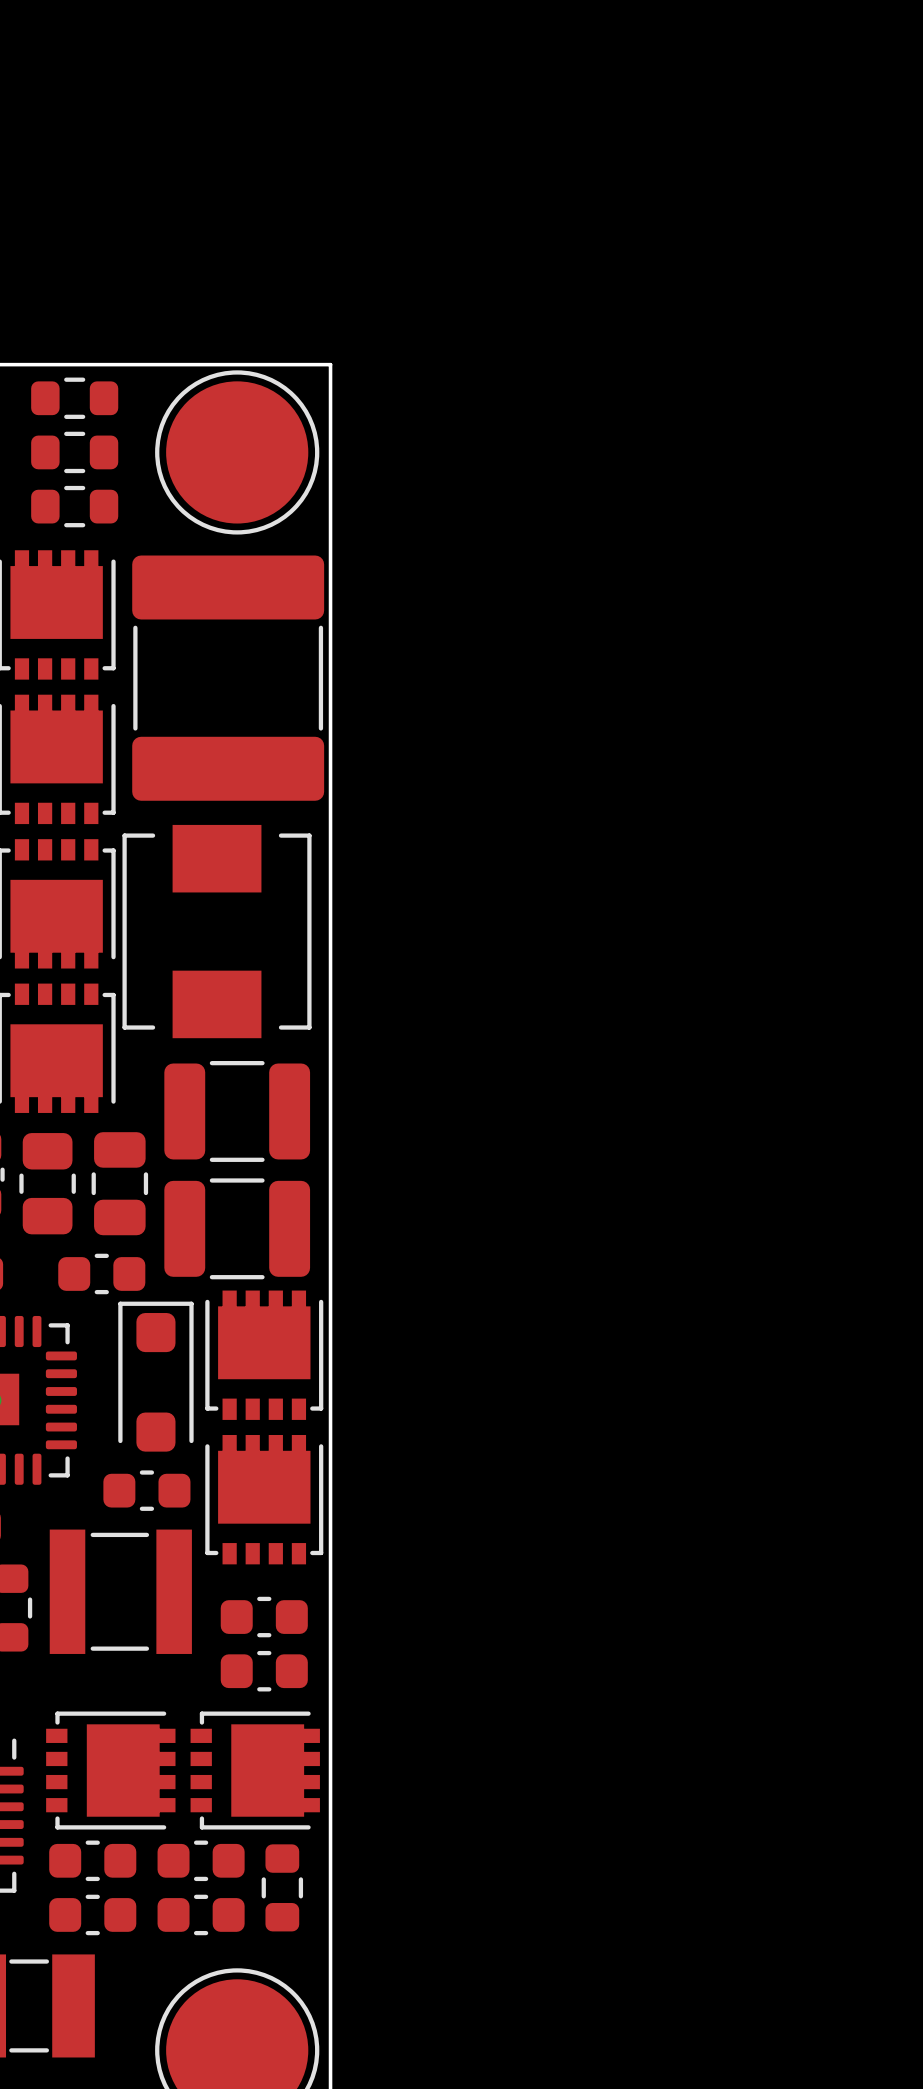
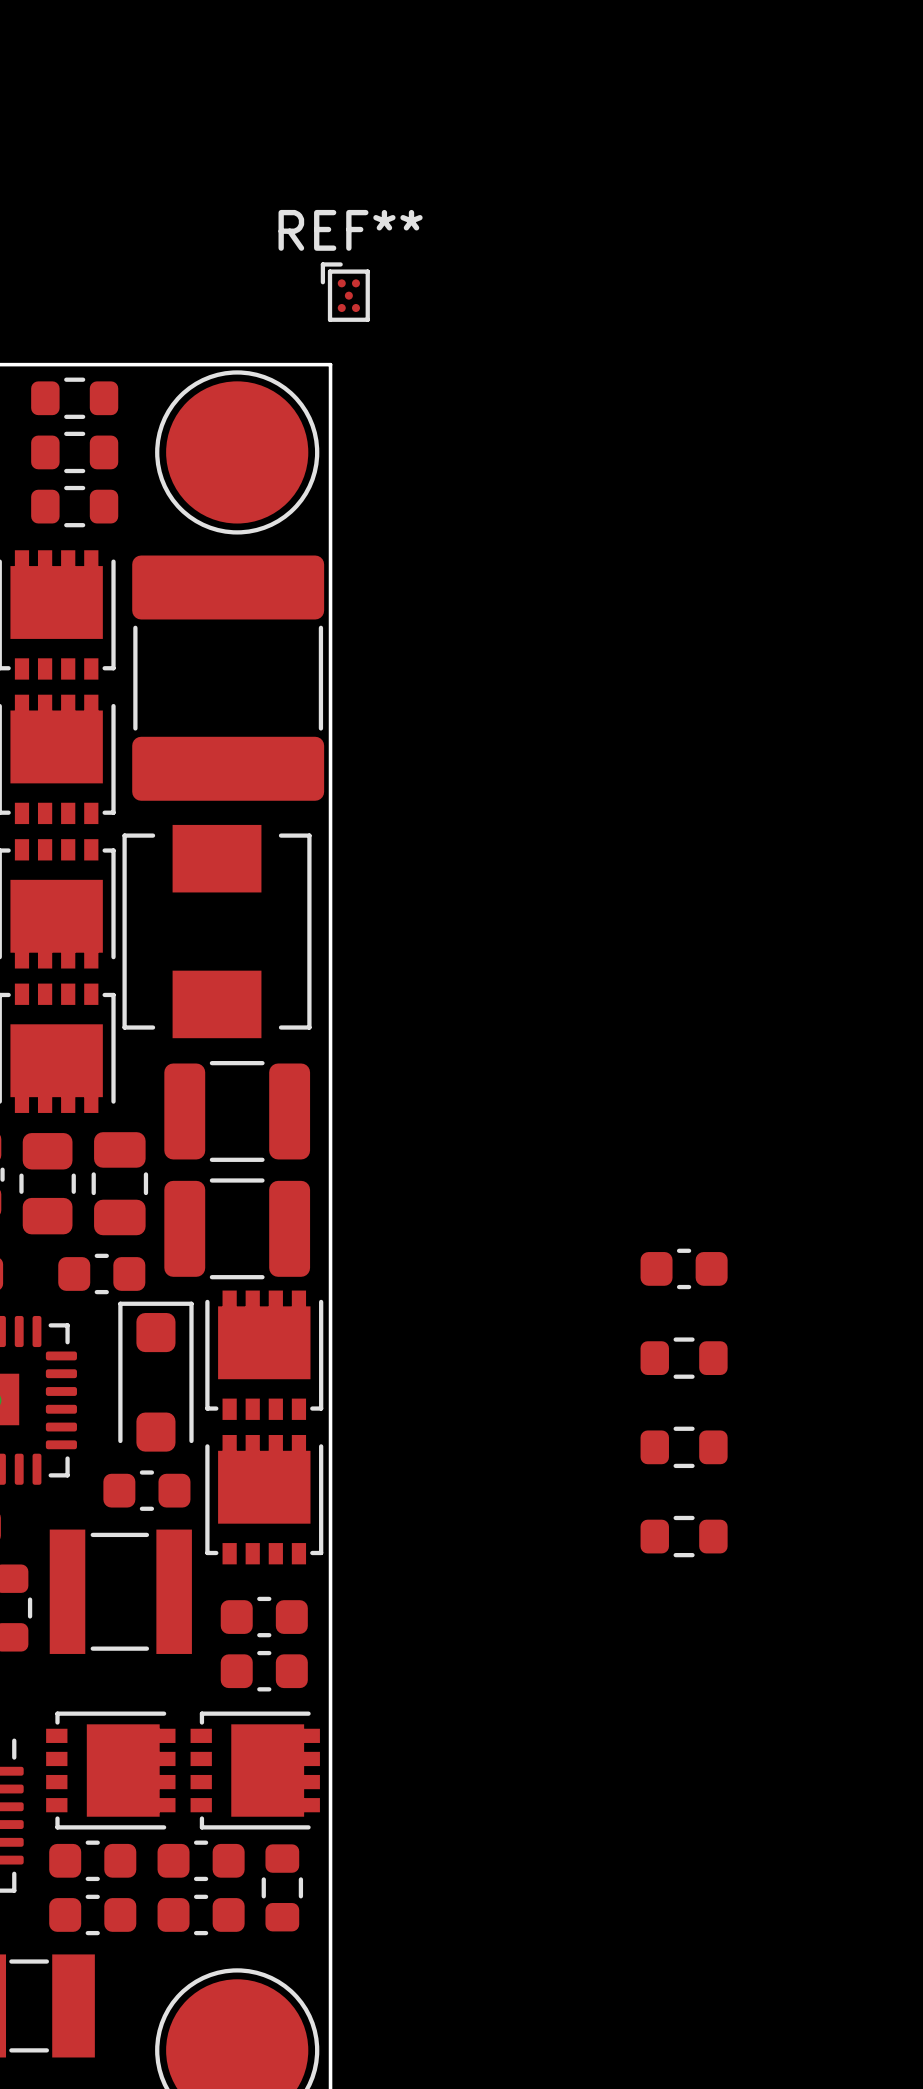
REF**: none -> (345, 292)
part: none -> (684, 1268)
part: none -> (684, 1358)
part: none -> (684, 1447)
part: none -> (684, 1536)

